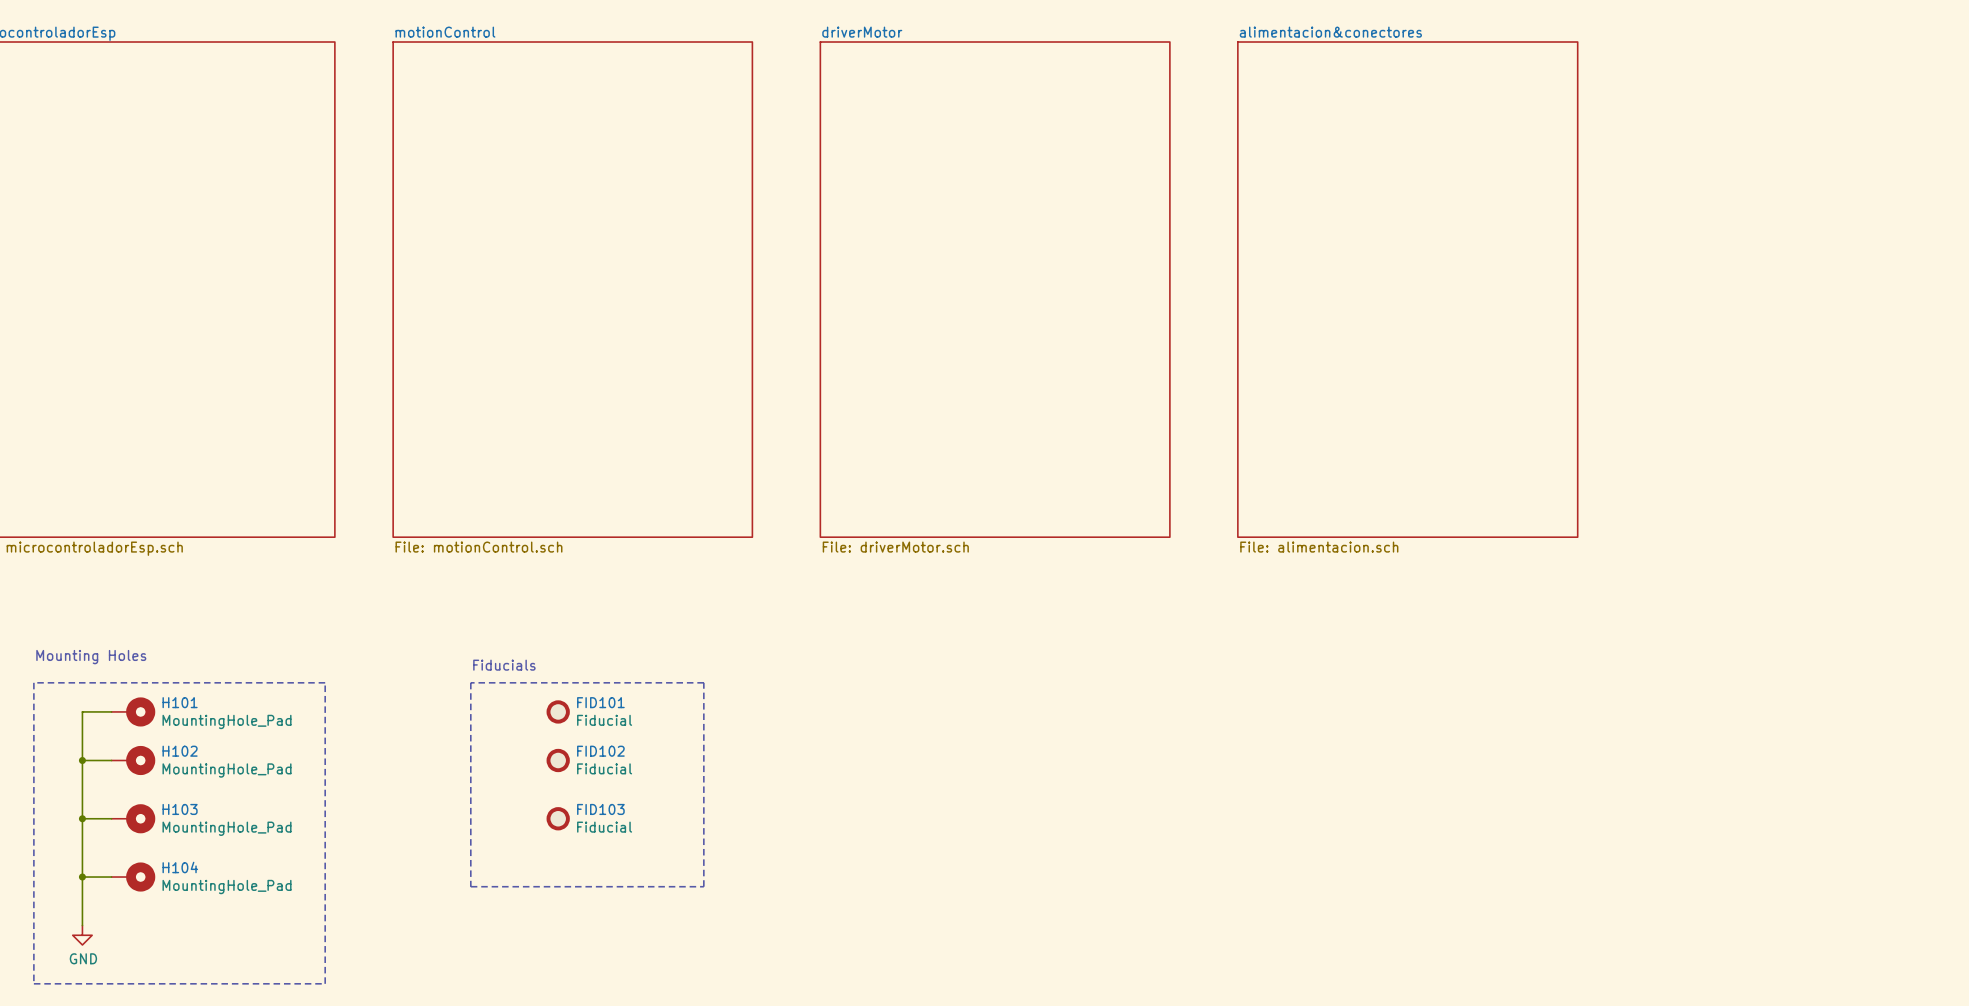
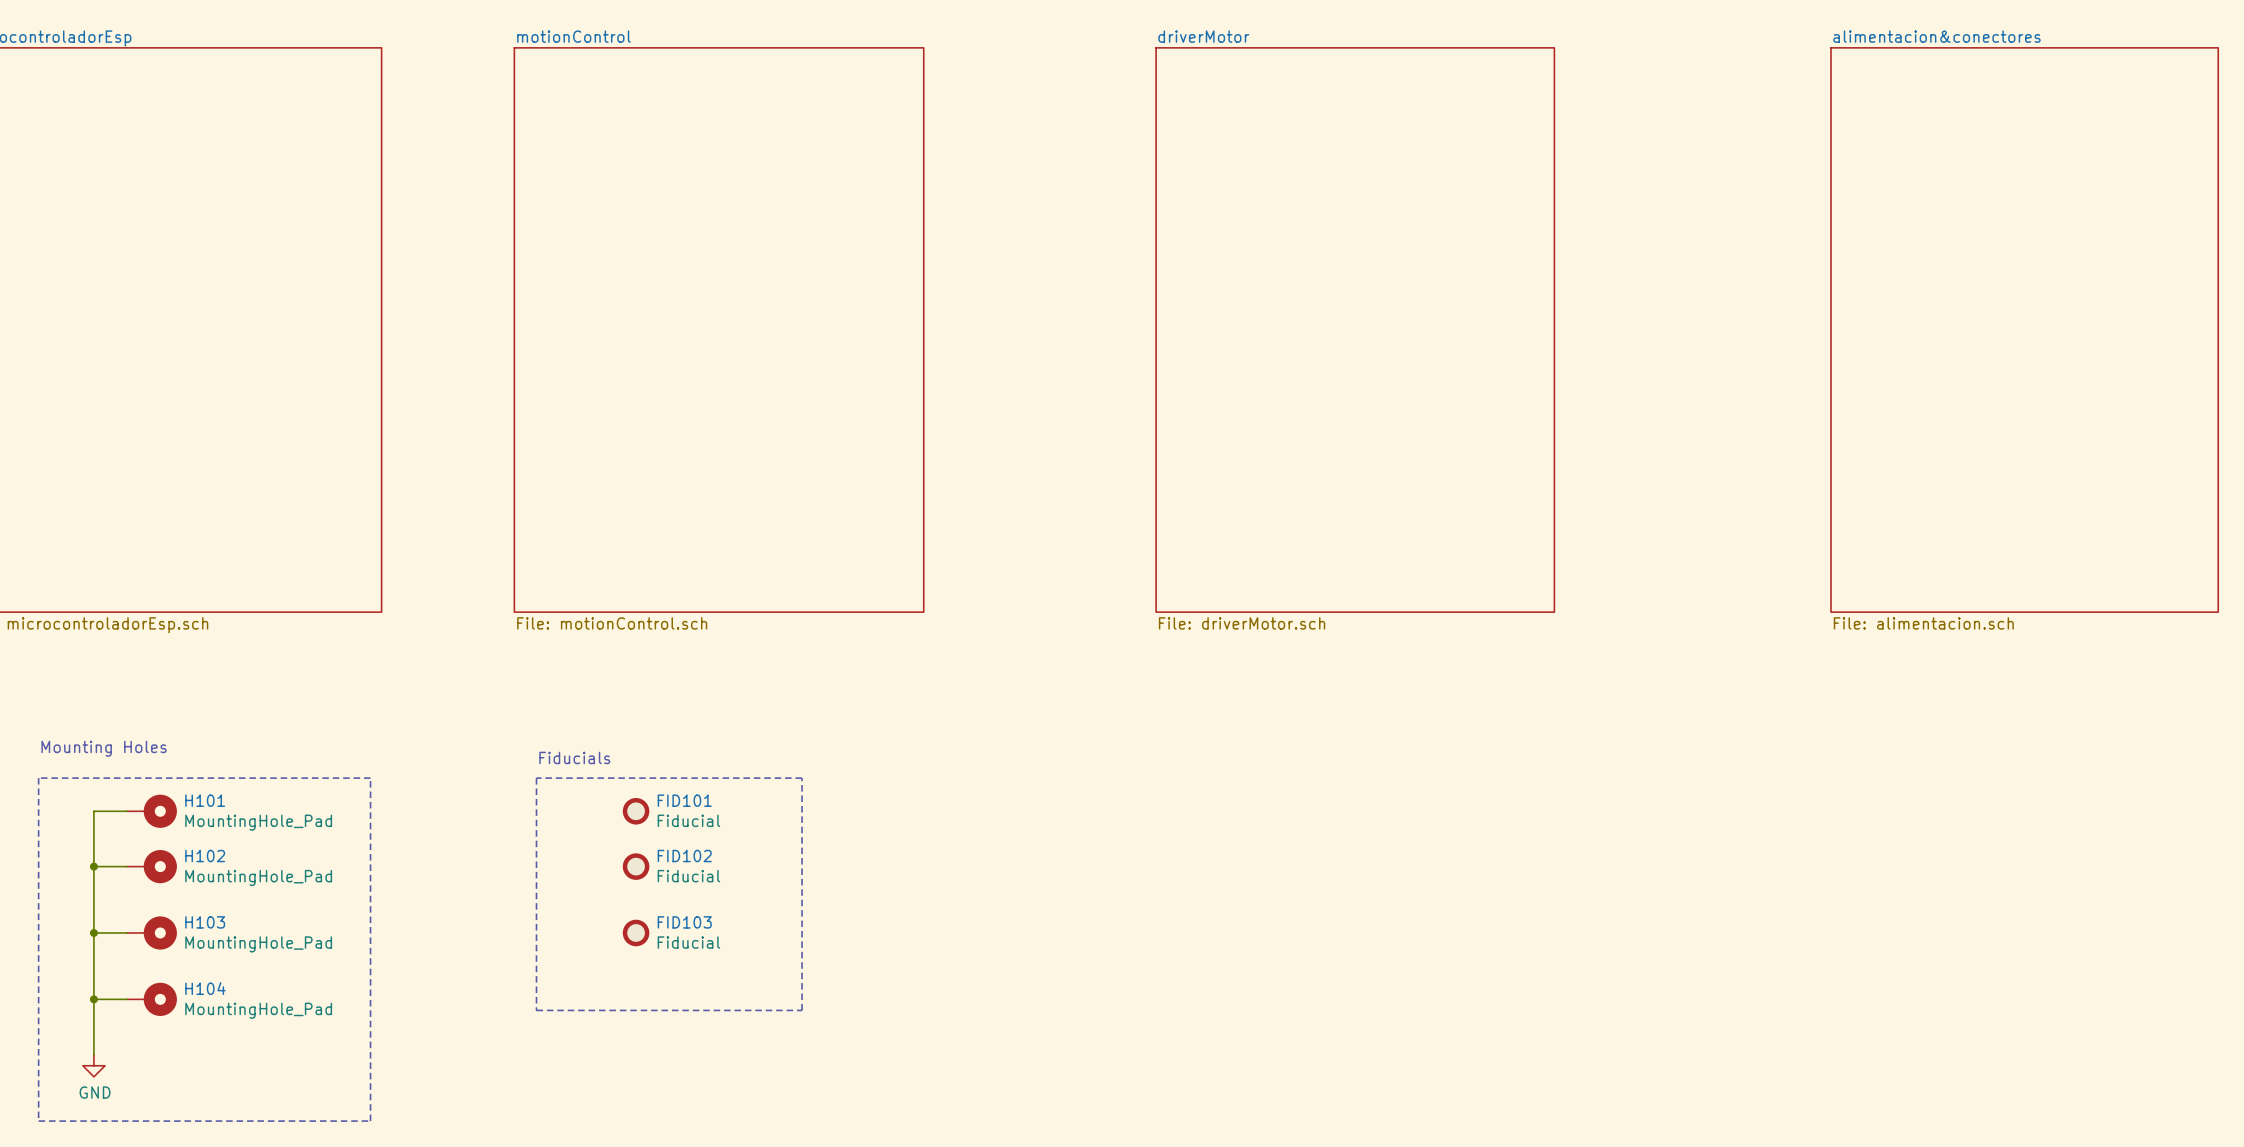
sheet motionControl position: (572, 289) -> (719, 329)
sheet driverMotor: File: driverMotor.sch (995, 289) -> none
sheet driverMotor: none -> File: driverMotor.sch (1355, 329)
sheet alimentacion&conectores: File: alimentacion.sch (1407, 289) -> none
sheet alimentacion&conectores: none -> File: alimentacion.sch (2024, 329)

